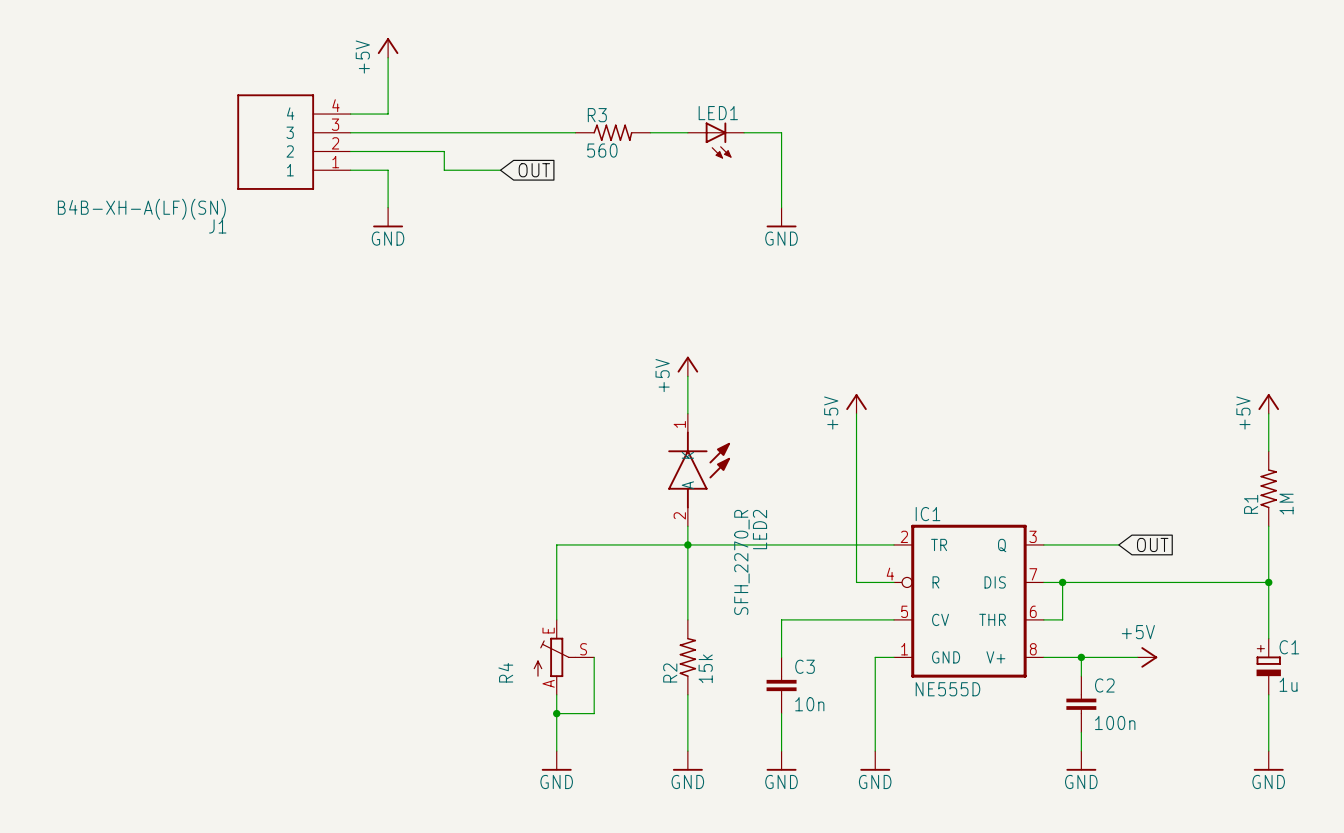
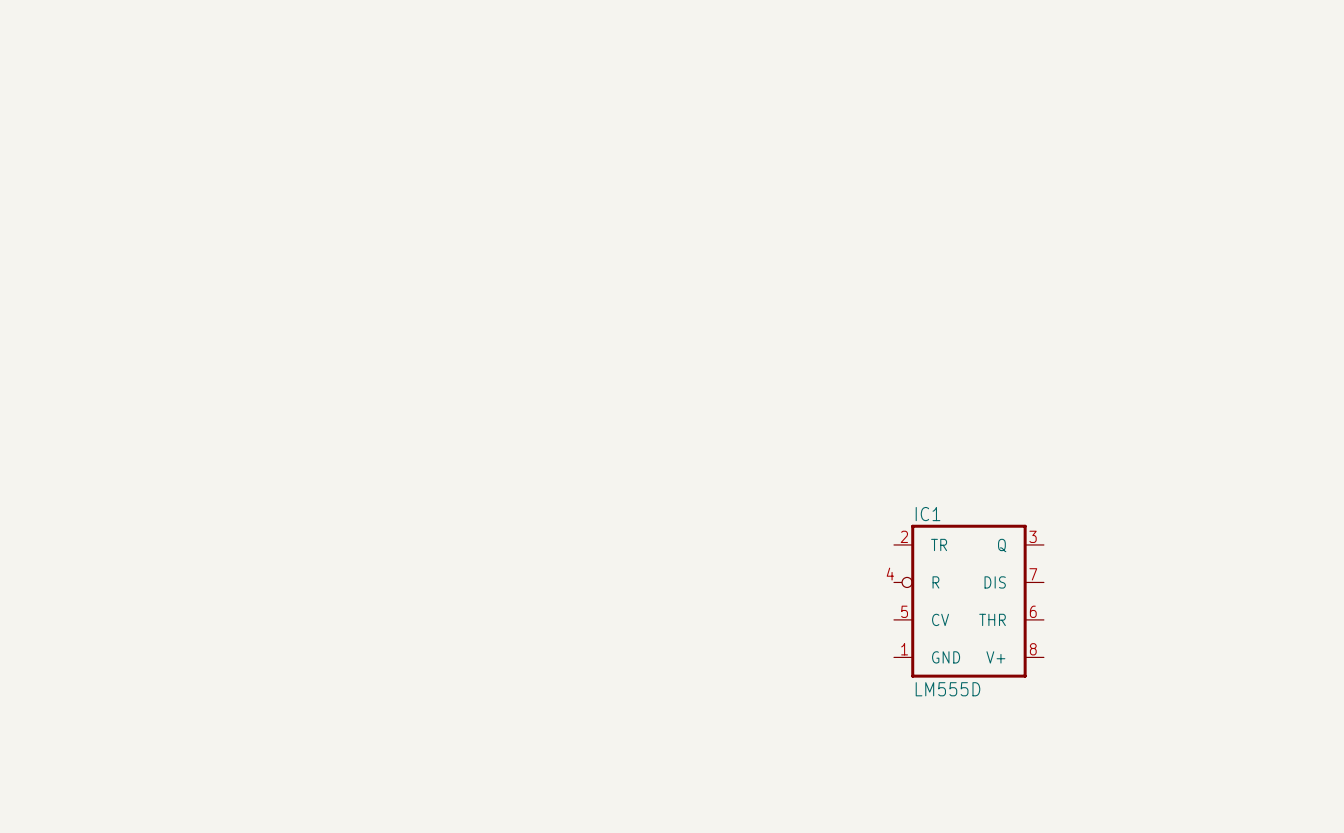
power symbol: +5V (388, 47) -> none
wire: (388, 57) (388, 114) (350, 114) -> none
wire: (350, 132) (575, 132) -> none
R3: 560 (612, 132) -> none
wire: (650, 132) (687, 132) -> none
wire: (744, 132) (781, 132) (781, 207) -> none
LED1: (715, 140) -> none
J1: B4B-XH-A(LF)(SN) (293, 142) -> none
wire: (350, 151) (444, 151) (444, 170) (500, 170) -> none
wire: (350, 170) (388, 170) (388, 207) -> none
global label: OUT (534, 170) -> none
power symbol: GND (388, 217) -> none
power symbol: GND (781, 217) -> none
power symbol: +5V (687, 366) -> none
wire: (687, 376) (687, 413) -> none
power symbol: +5V (856, 403) -> none
power symbol: +5V (1268, 403) -> none
wire: (856, 413) (856, 582) (893, 582) -> none
wire: (1268, 413) (1268, 451) -> none
LED2: SFH_2270_R (699, 470) -> none
R1: 1M (1268, 488) -> none
wire: (687, 526) (687, 619) -> none
wire: (1268, 526) (1268, 638) -> none
junction: (687, 544) -> none
wire: (893, 544) (556, 544) (556, 619) -> none
wire: (1043, 544) (1118, 544) -> none
global label: OUT (1152, 544) -> none
wire: (1043, 582) (1268, 582) -> none
wire: (1062, 582) (1062, 619) (1043, 619) -> none
junction: (1062, 582) -> none
junction: (1268, 582) -> none
wire: (893, 619) (781, 619) (781, 657) -> none
R4: (563, 657) -> none
wire: (594, 657) (594, 713) (556, 713) -> none
R2: 15k (687, 657) -> none
wire: (893, 657) (875, 657) (875, 751) -> none
wire: (1043, 657) (1137, 657) -> none
wire: (1081, 657) (1081, 676) -> none
junction: (1081, 657) -> none
power symbol: +5V (1147, 657) -> none
C1: 1u (1268, 666) -> none
C3: 10n (781, 685) -> none
IC1 value: NE555D (947, 689) -> LM555D (947, 689)
wire: (556, 694) (556, 751) -> none
wire: (687, 694) (687, 751) -> none
wire: (1268, 694) (1268, 751) -> none
C2: 100n (1081, 704) -> none
junction: (556, 713) -> none
wire: (781, 713) (781, 751) -> none
wire: (1081, 732) (1081, 751) -> none
power symbol: GND (556, 760) -> none
power symbol: GND (687, 760) -> none
power symbol: GND (781, 760) -> none
power symbol: GND (875, 760) -> none
power symbol: GND (1081, 760) -> none
power symbol: GND (1268, 760) -> none

